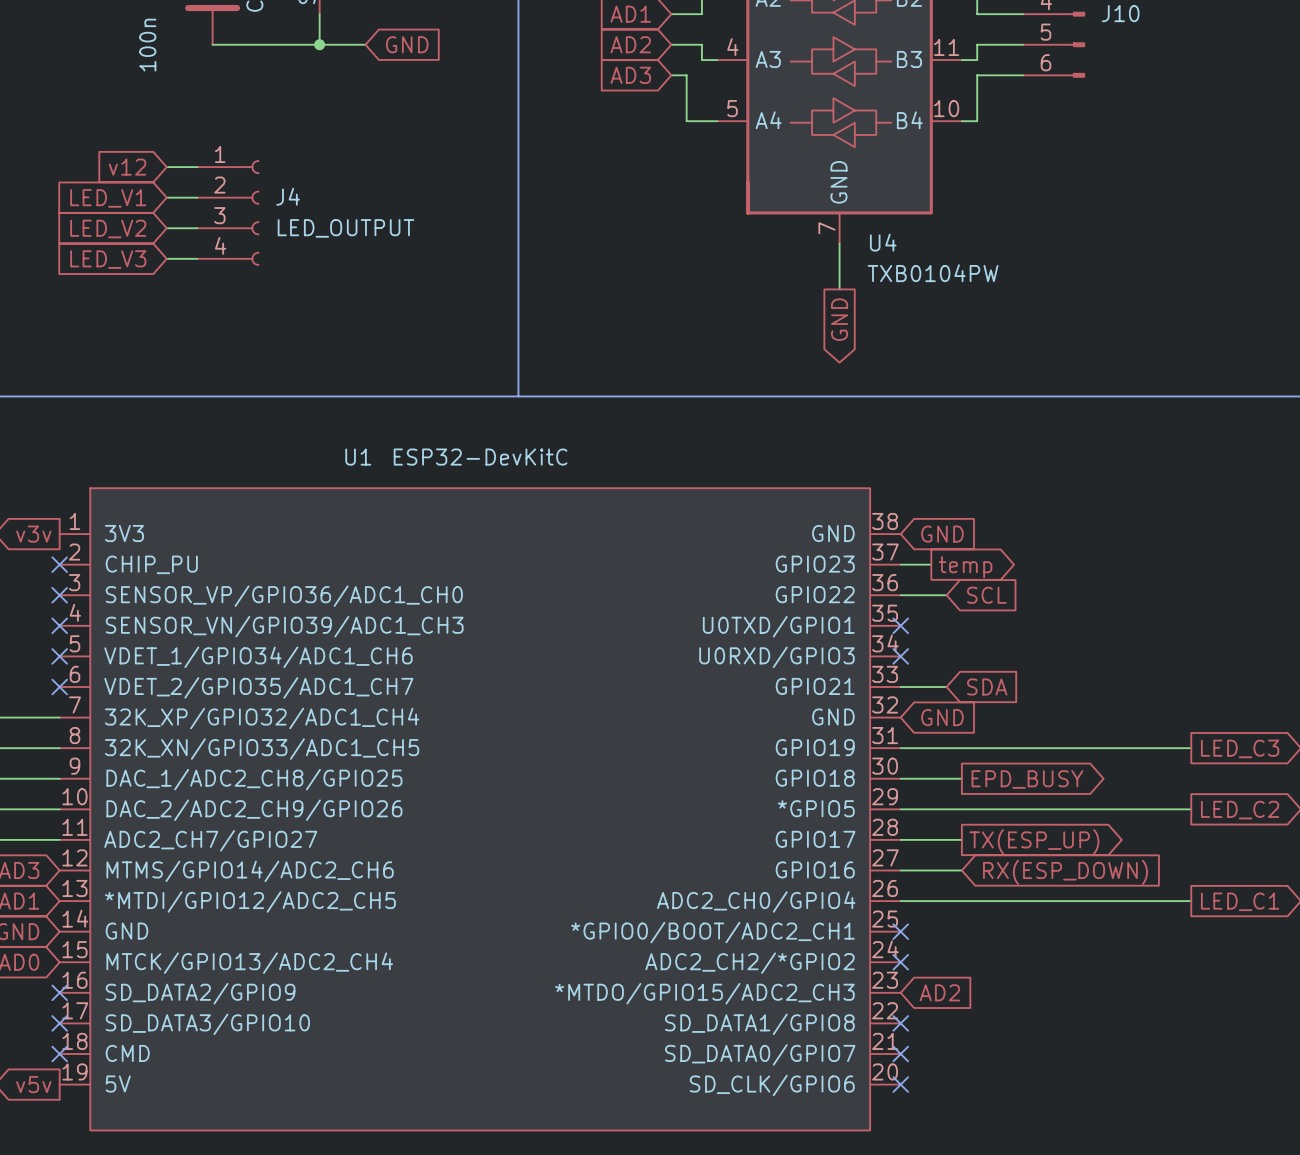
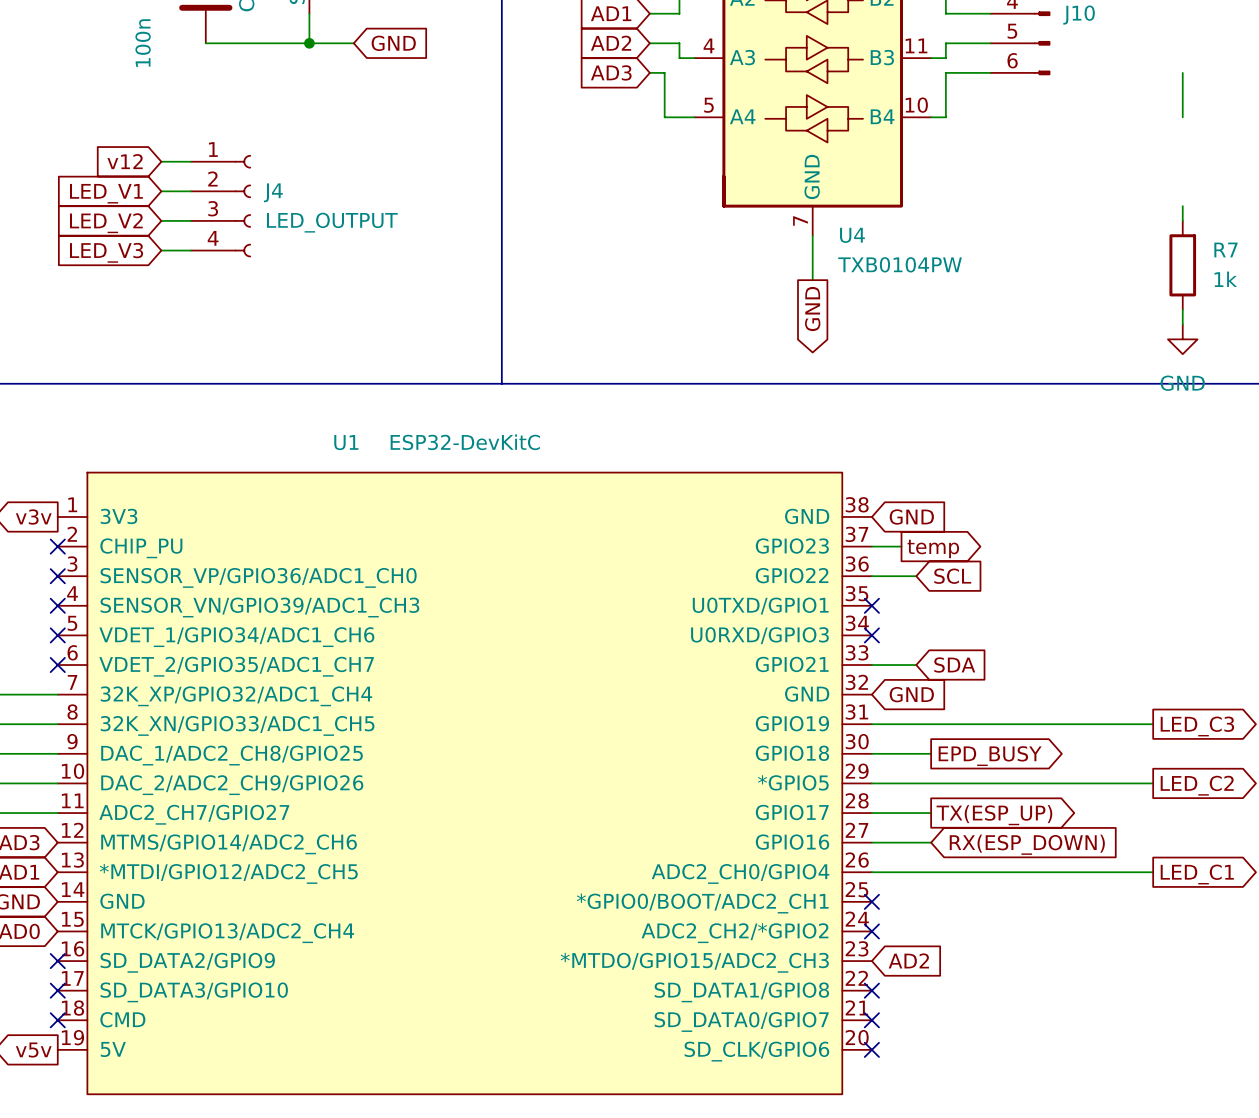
wire: none -> (1182, 72) (1182, 117)
wire: none -> (1182, 206) (1182, 220)
R7: none -> 1k (1182, 265)
wire: none -> (1182, 309) (1182, 324)
power symbol: none -> GND (1182, 339)

